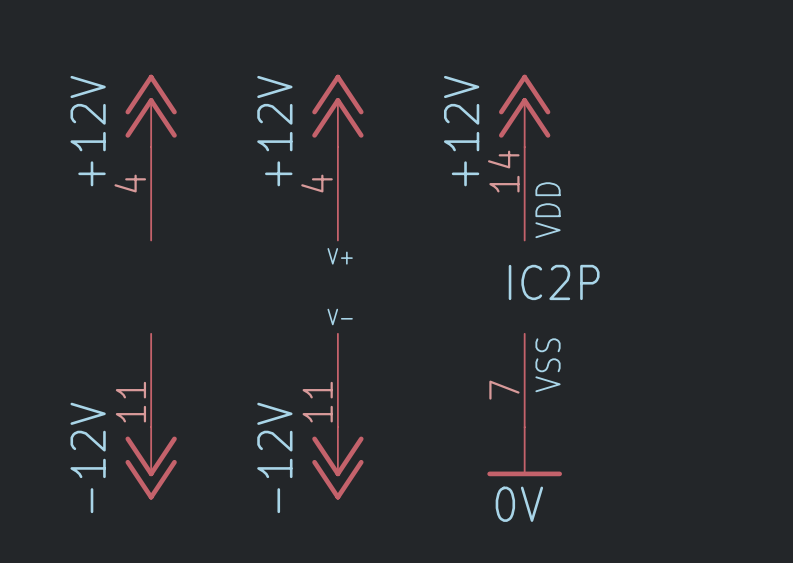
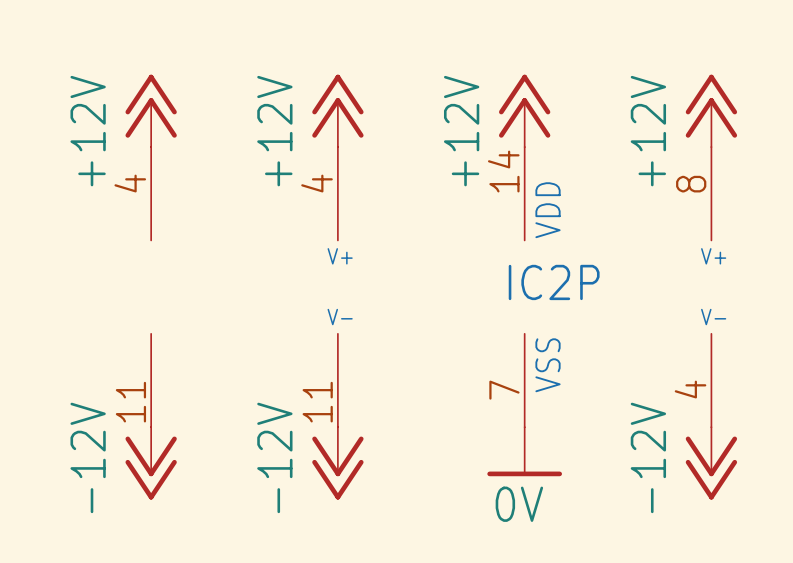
power symbol: none -> +12V (711, 110)
part: none -> (711, 287)
power symbol: none -> -12V (711, 463)

